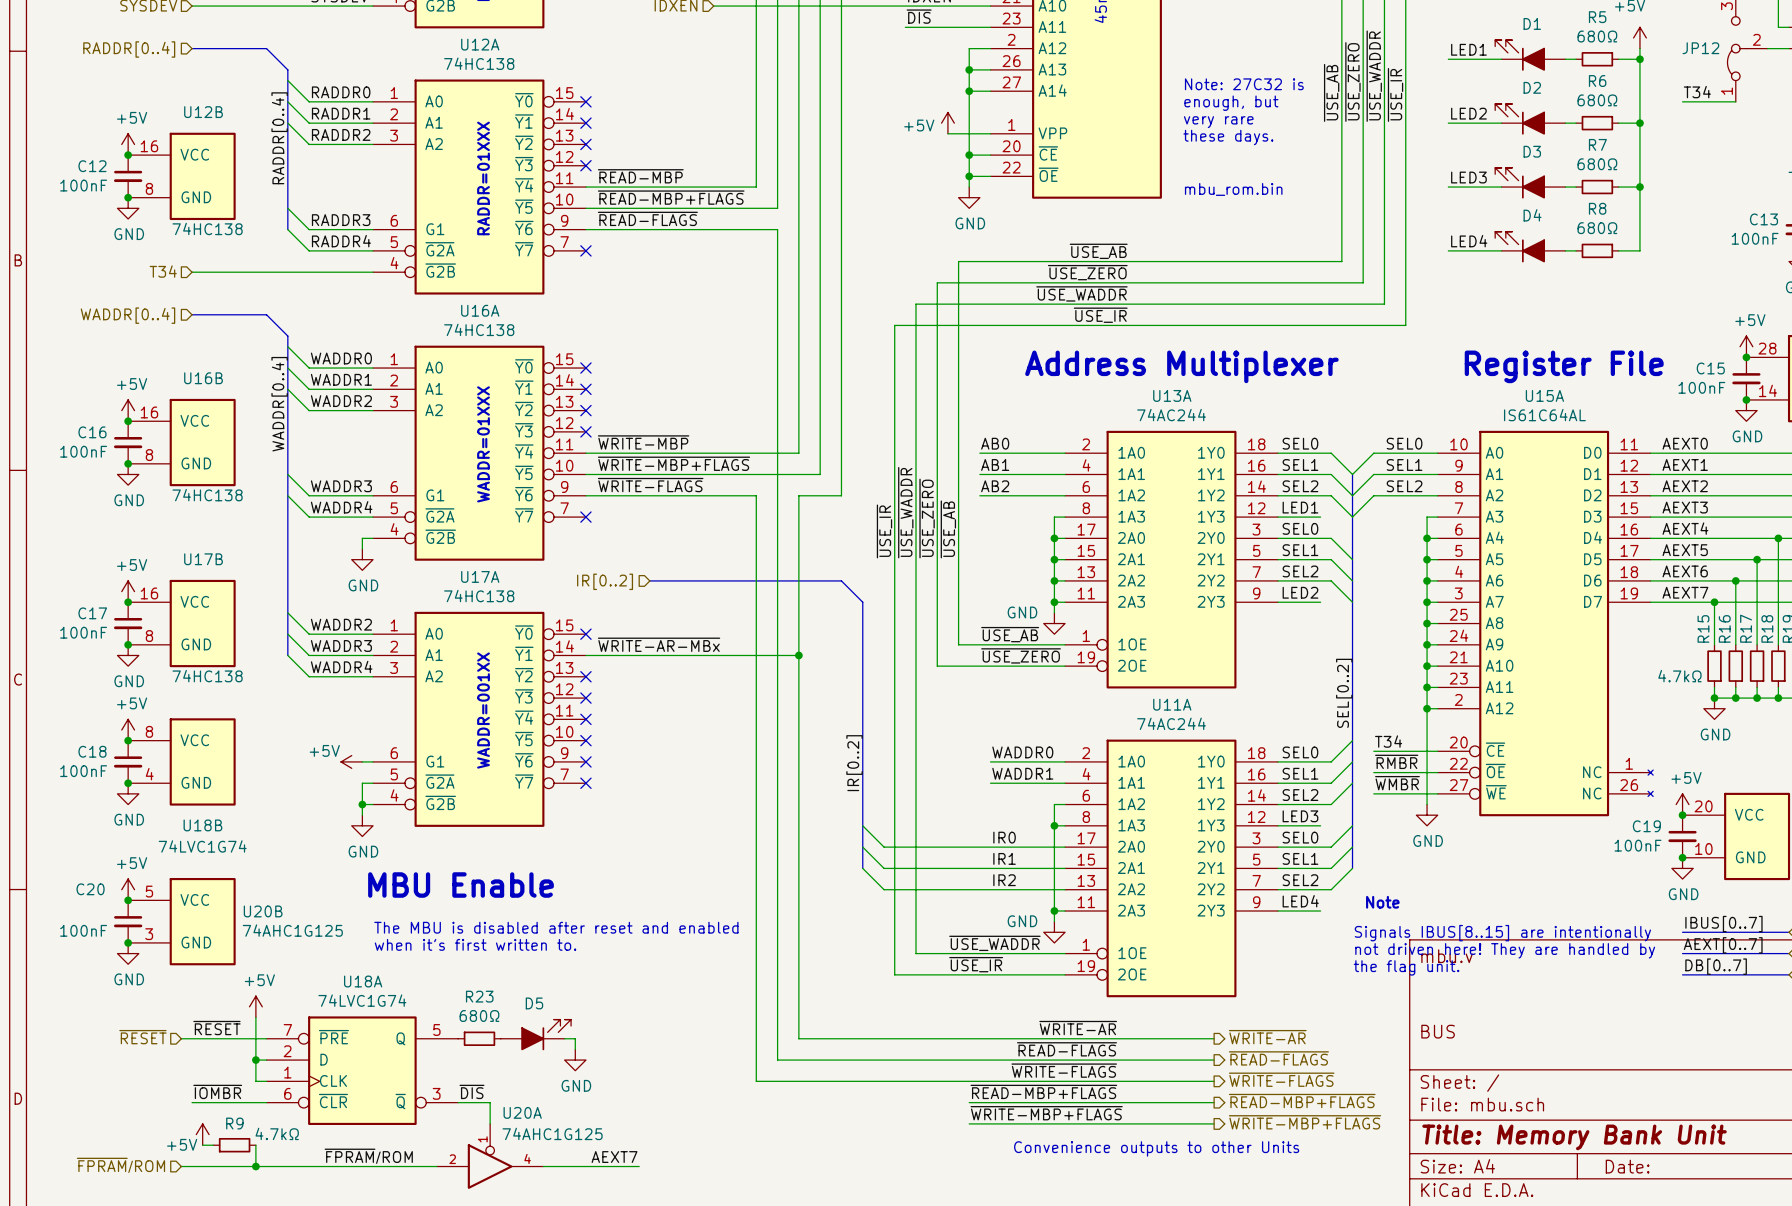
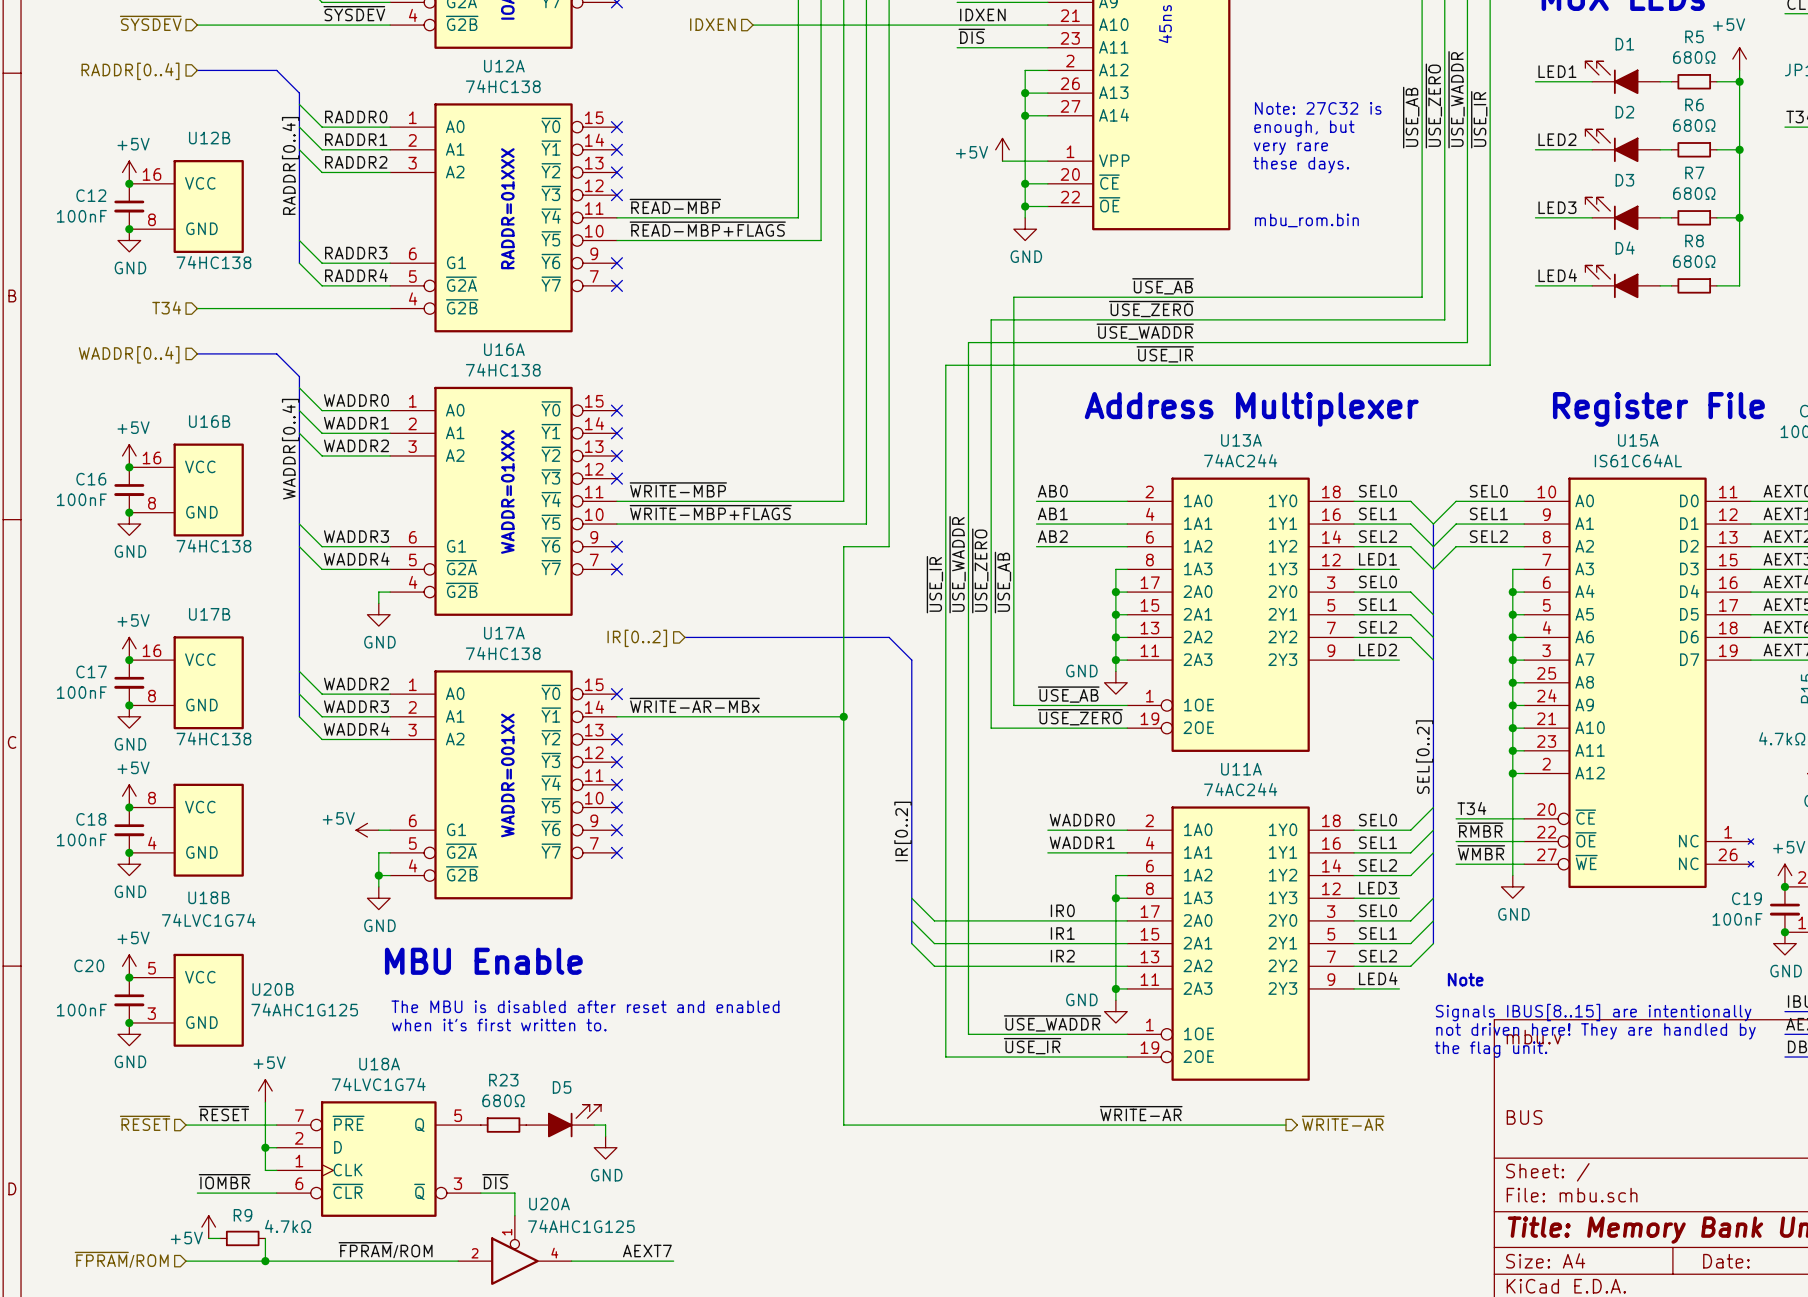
label: ~{READ-FLAGS} (647, 218) -> none
wire: (585, 229) (777, 229) (777, 1060) (1214, 1060) -> none
no-connect mark: none -> (616, 263)
label: ~{WRITE-FLAGS} (650, 485) -> none
wire: (585, 495) (756, 495) (756, 1081) (1214, 1081) -> none
no-connect mark: none -> (616, 546)
label: ~{READ-FLAGS} (1067, 1049) -> none
hierarchical label: ~{READ-FLAGS} (1278, 1058) -> none
label: ~{WRITE-FLAGS} (1064, 1070) -> none
hierarchical label: ~{WRITE-FLAGS} (1281, 1079) -> none
label: ~{READ-MBP+FLAGS} (1043, 1091) -> none
hierarchical label: ~{READ-MBP+FLAGS} (1302, 1101) -> none
wire: (969, 1102) (1214, 1102) -> none
label: ~{WRITE-MBP+FLAGS} (1046, 1113) -> none
hierarchical label: ~{WRITE-MBP+FLAGS} (1305, 1122) -> none
wire: (969, 1123) (1214, 1123) -> none
text: Convenience outputs to other Units (1156, 1148) -> none

